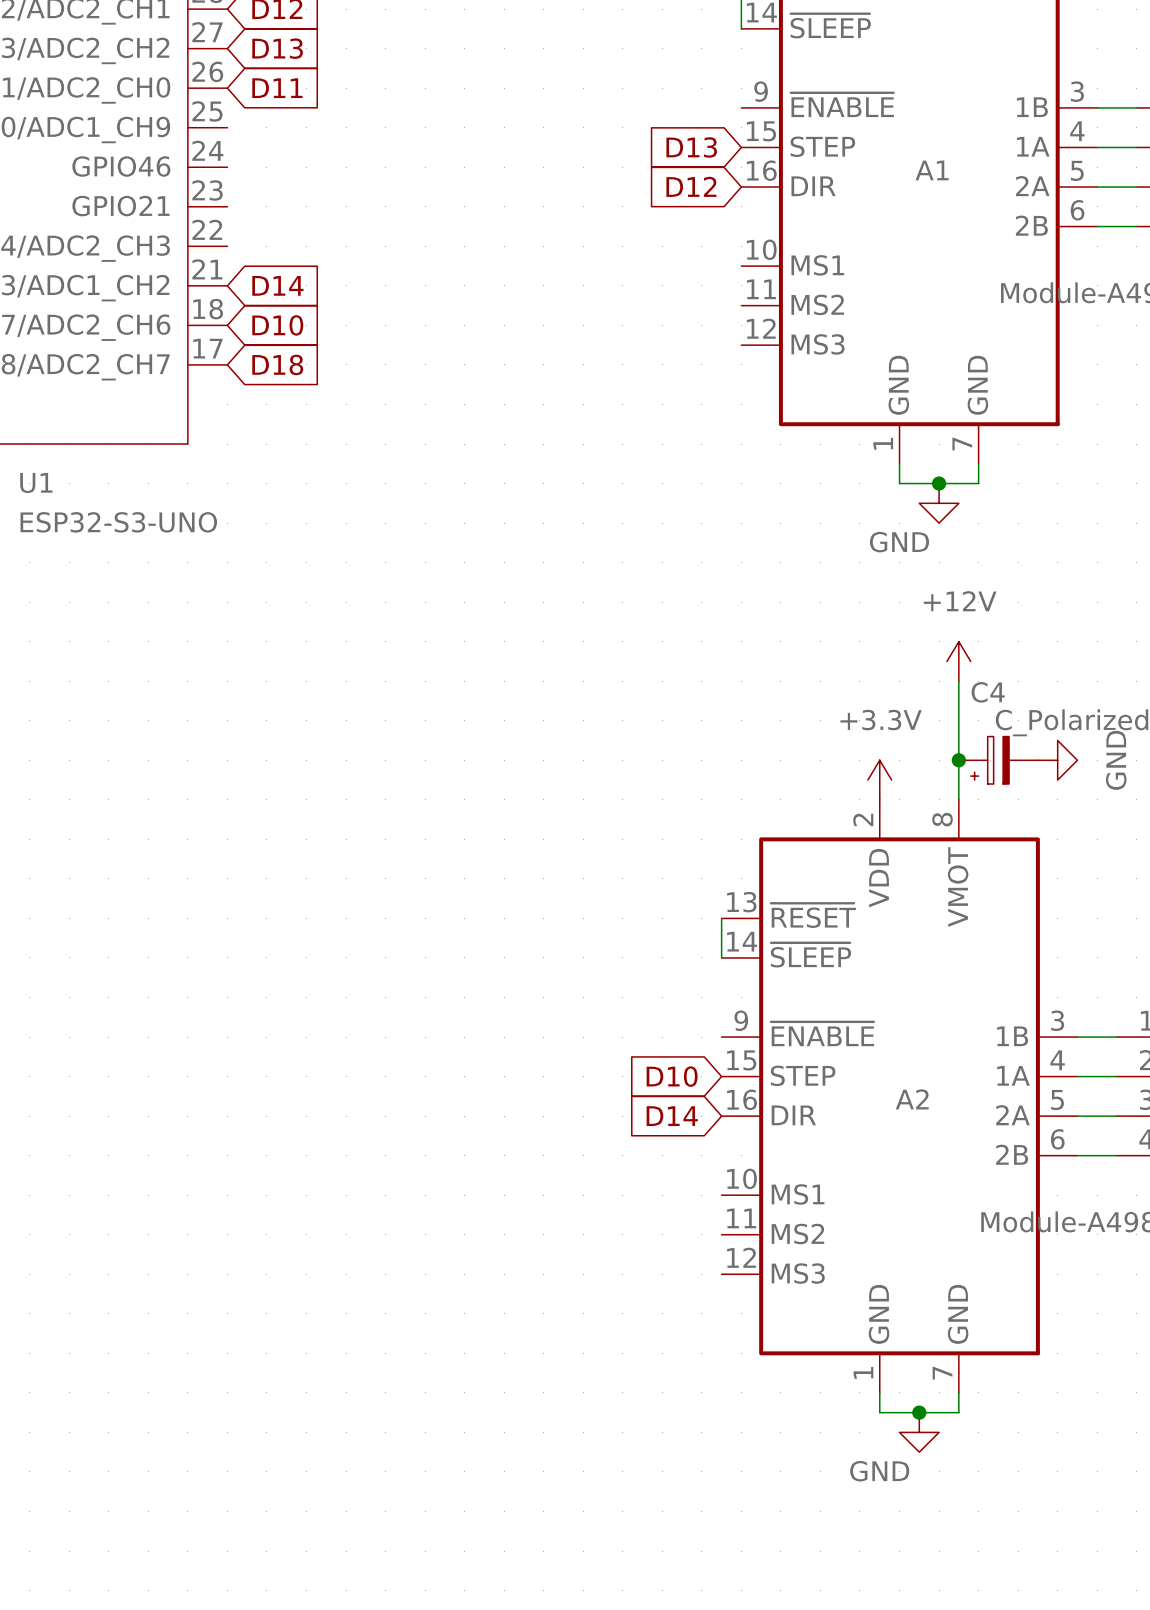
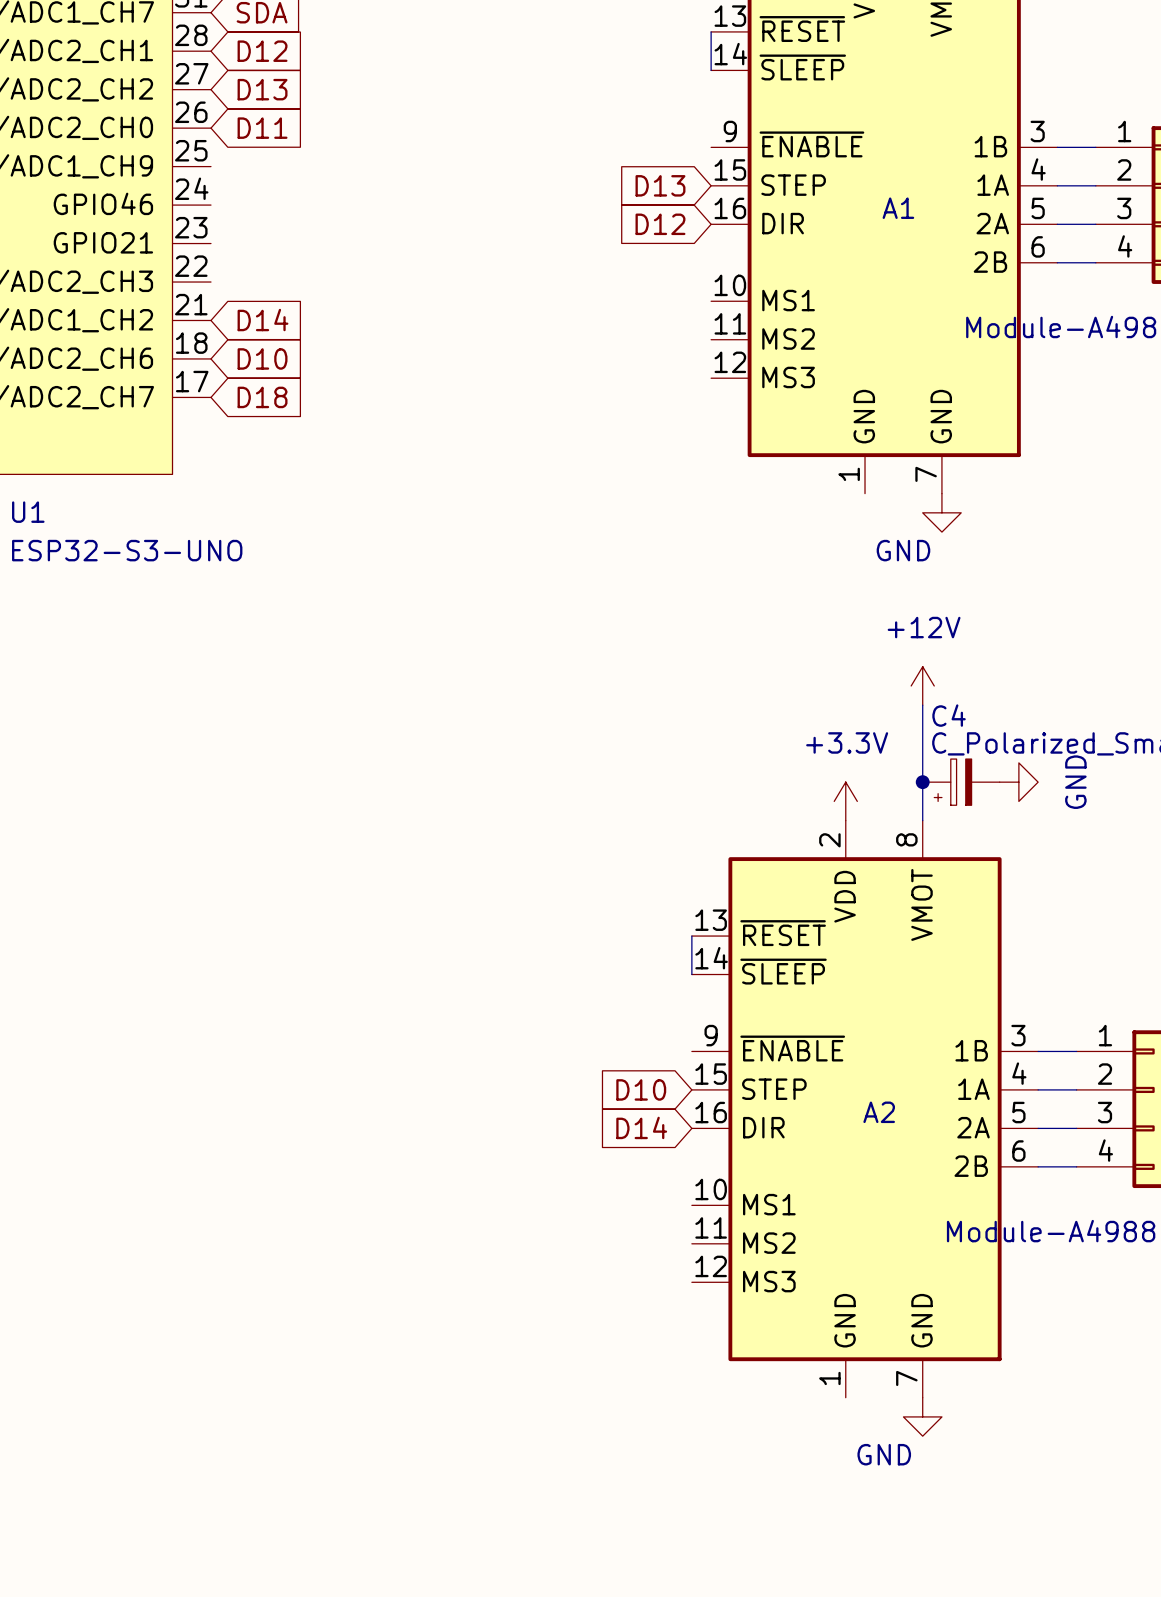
wire: (899, 463) (899, 483) (978, 483) (978, 463) -> none
junction: (939, 483) -> none
power symbol position: GND (939, 503) -> GND (941, 512)
wire: (879, 1392) (879, 1412) (958, 1412) (958, 1392) -> none
junction: (919, 1412) -> none
power symbol position: GND (919, 1432) -> GND (922, 1416)

